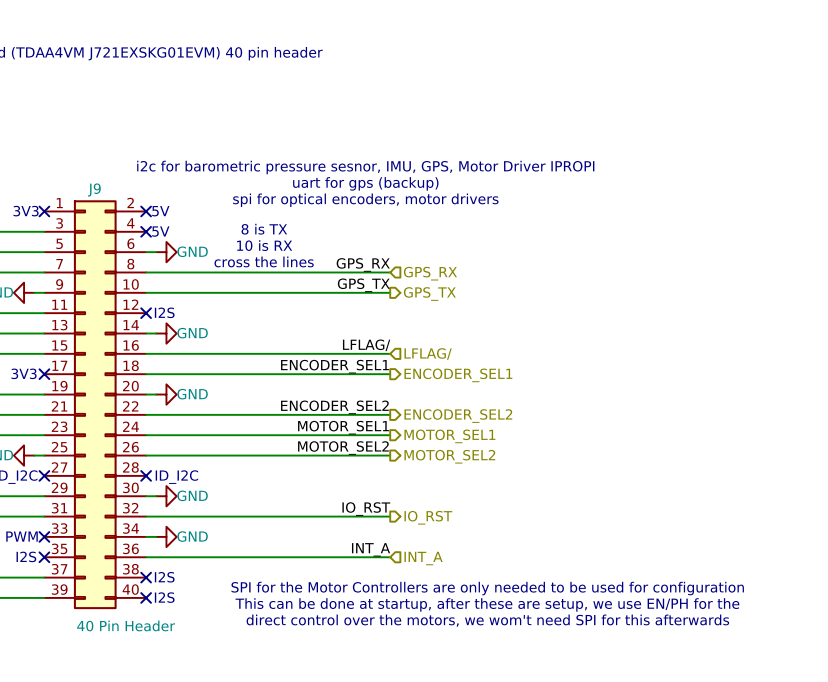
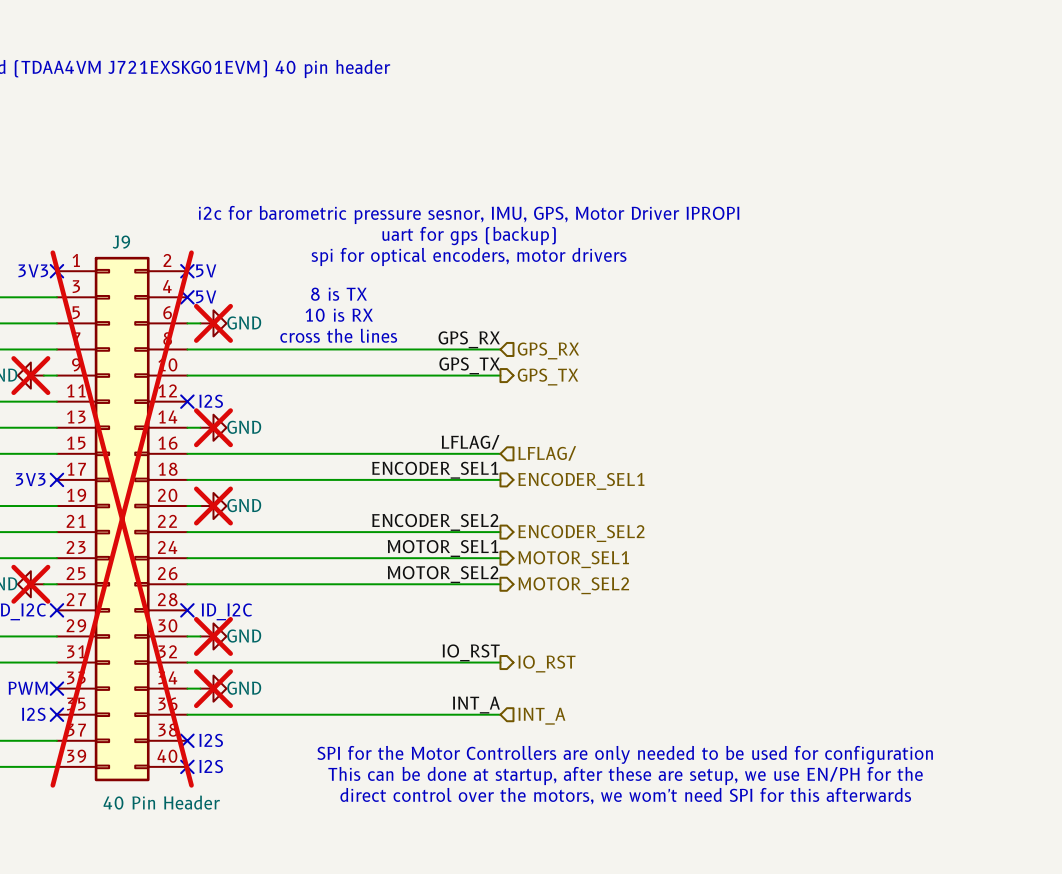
power symbol do-not-place cross: none -> (213, 323)
power symbol do-not-place cross: none -> (30, 375)
power symbol do-not-place cross: none -> (213, 427)
power symbol do-not-place cross: none -> (213, 506)
J9 do-not-place cross: none -> (122, 519)
power symbol do-not-place cross: none -> (30, 584)
power symbol do-not-place cross: none -> (213, 636)
power symbol do-not-place cross: none -> (213, 688)

